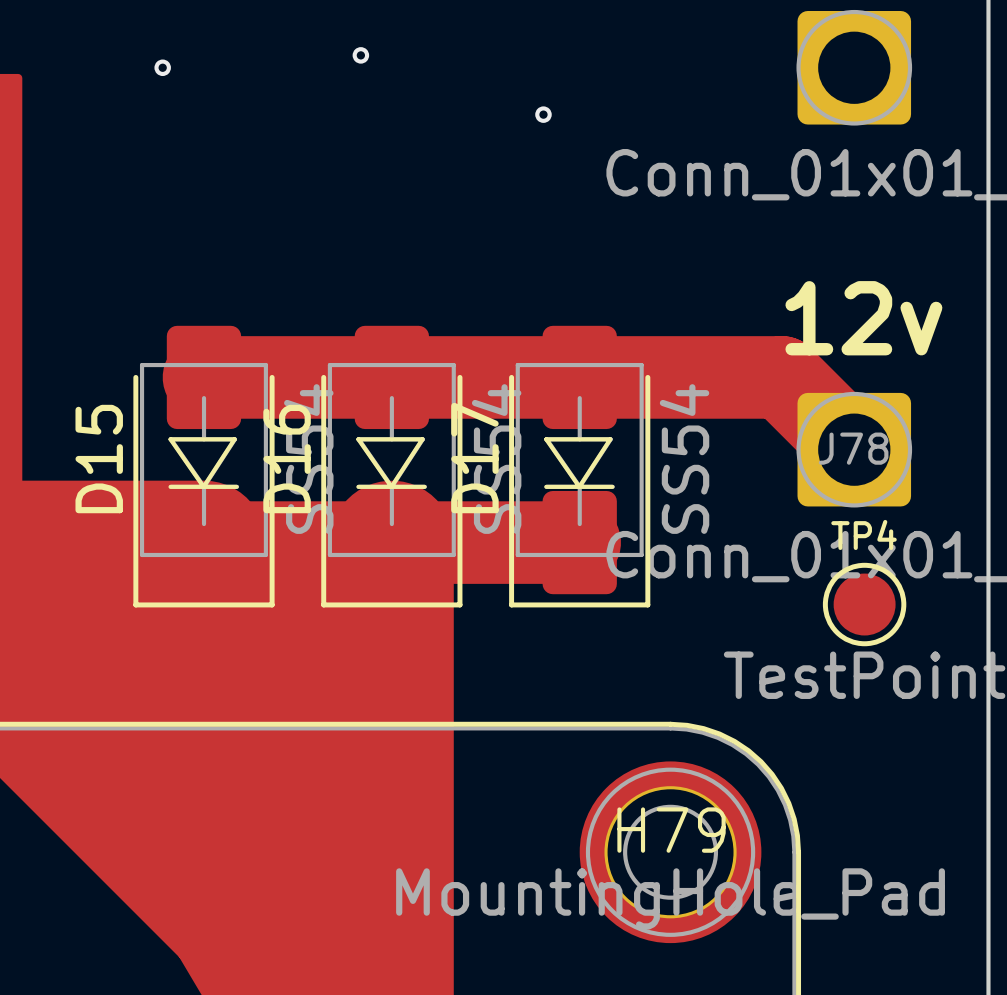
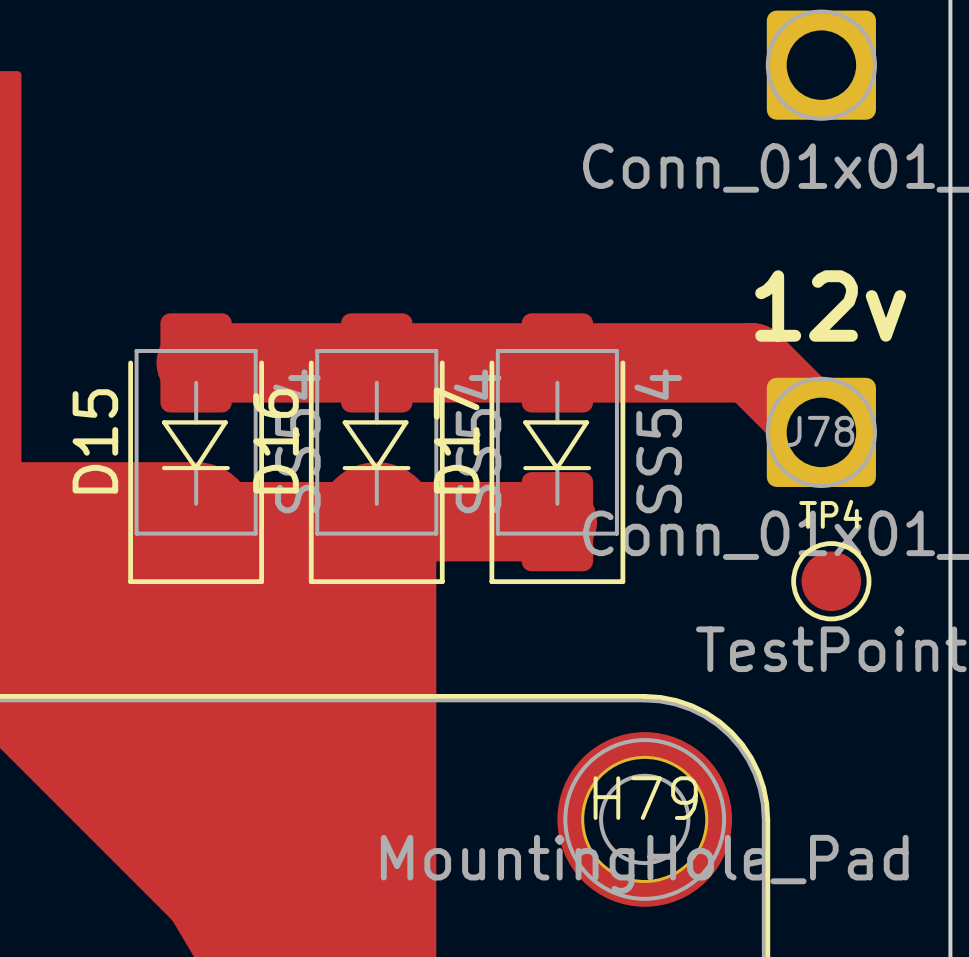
via: (360, 55) -> none
via: (162, 67) -> none
via: (543, 114) -> none

